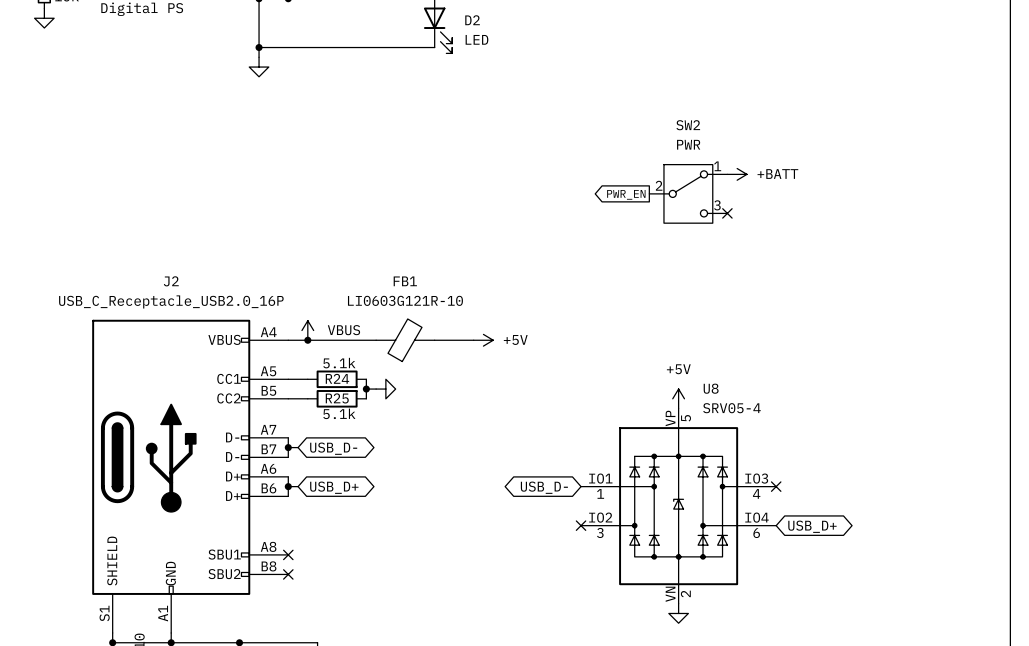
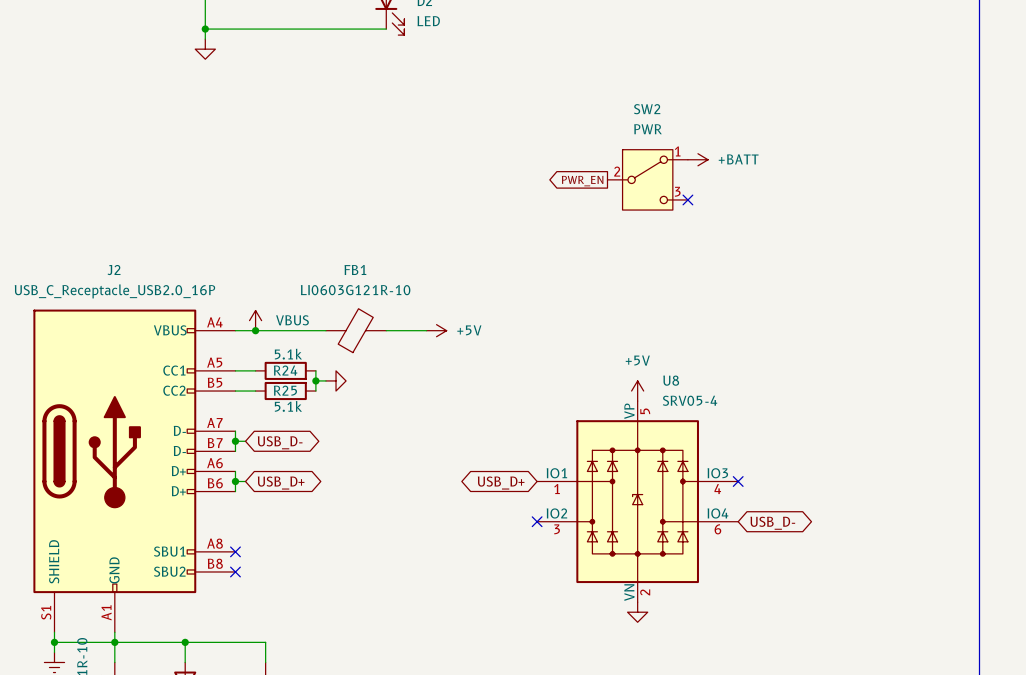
global label: USB_D- (544, 487) -> USB_D+ (501, 483)
global label: USB_D+ (812, 526) -> USB_D- (772, 523)

